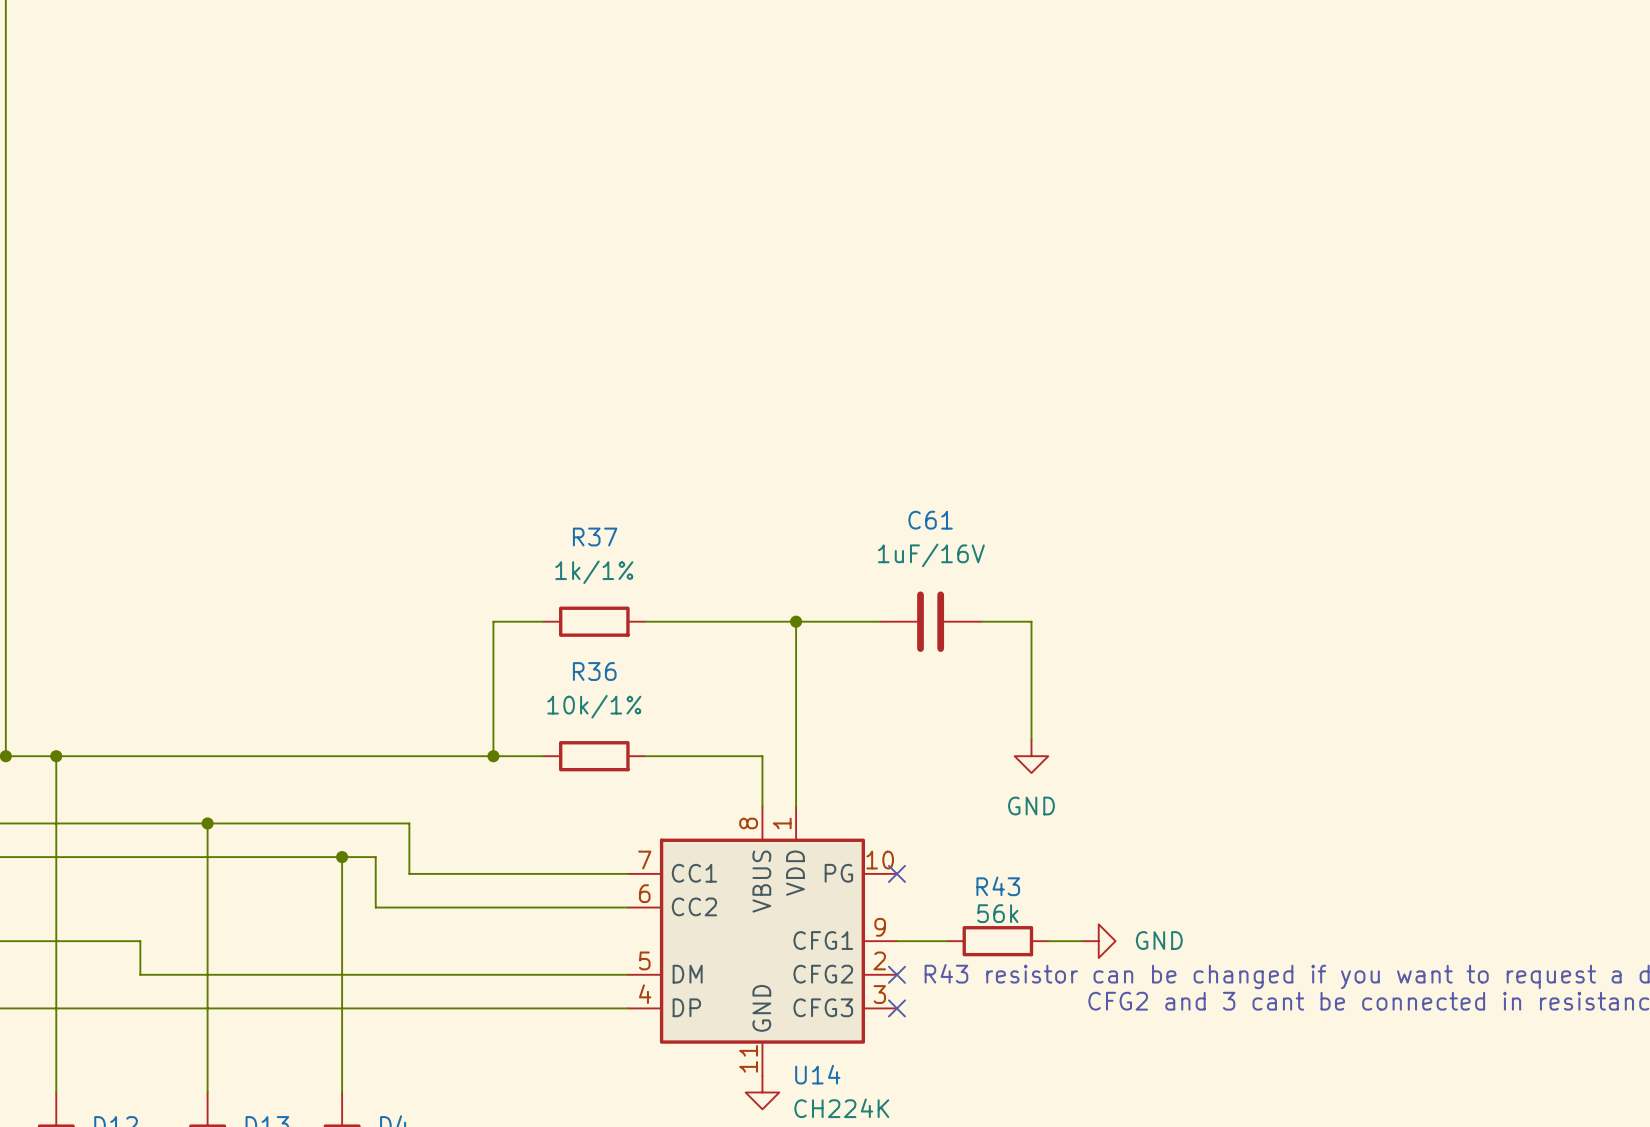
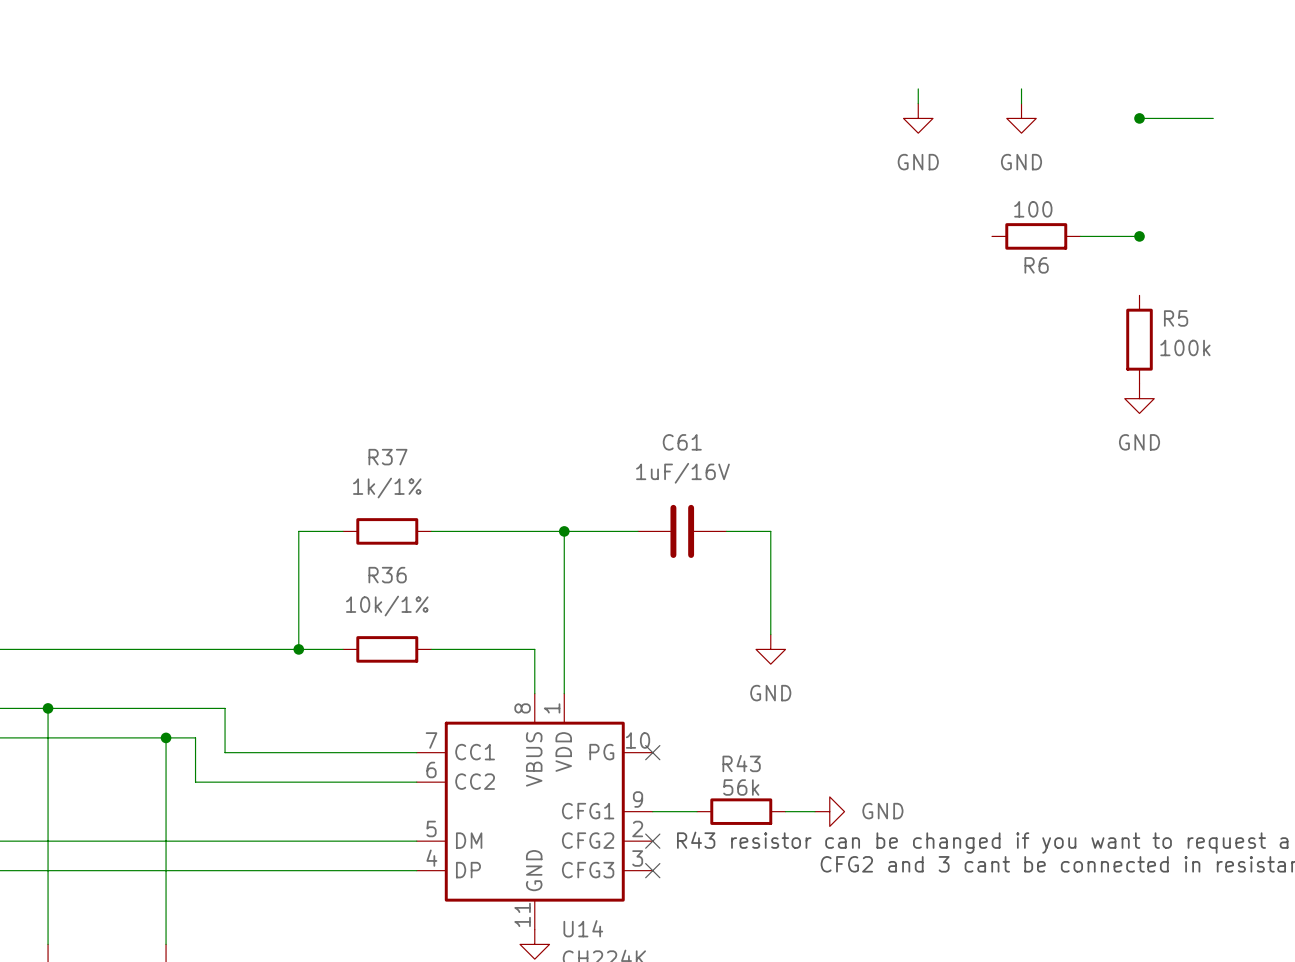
wire: none -> (918, 88) (918, 103)
wire: none -> (1021, 88) (1021, 103)
power symbol: none -> GND (918, 118)
power symbol: none -> GND (1021, 118)
wire: none -> (1139, 118) (1213, 118)
junction: none -> (1139, 118)
R6: none -> 100 (1036, 236)
wire: none -> (1080, 236) (1139, 236)
junction: none -> (1139, 236)
R5: none -> 100k (1139, 339)
power symbol: none -> GND (1139, 398)

